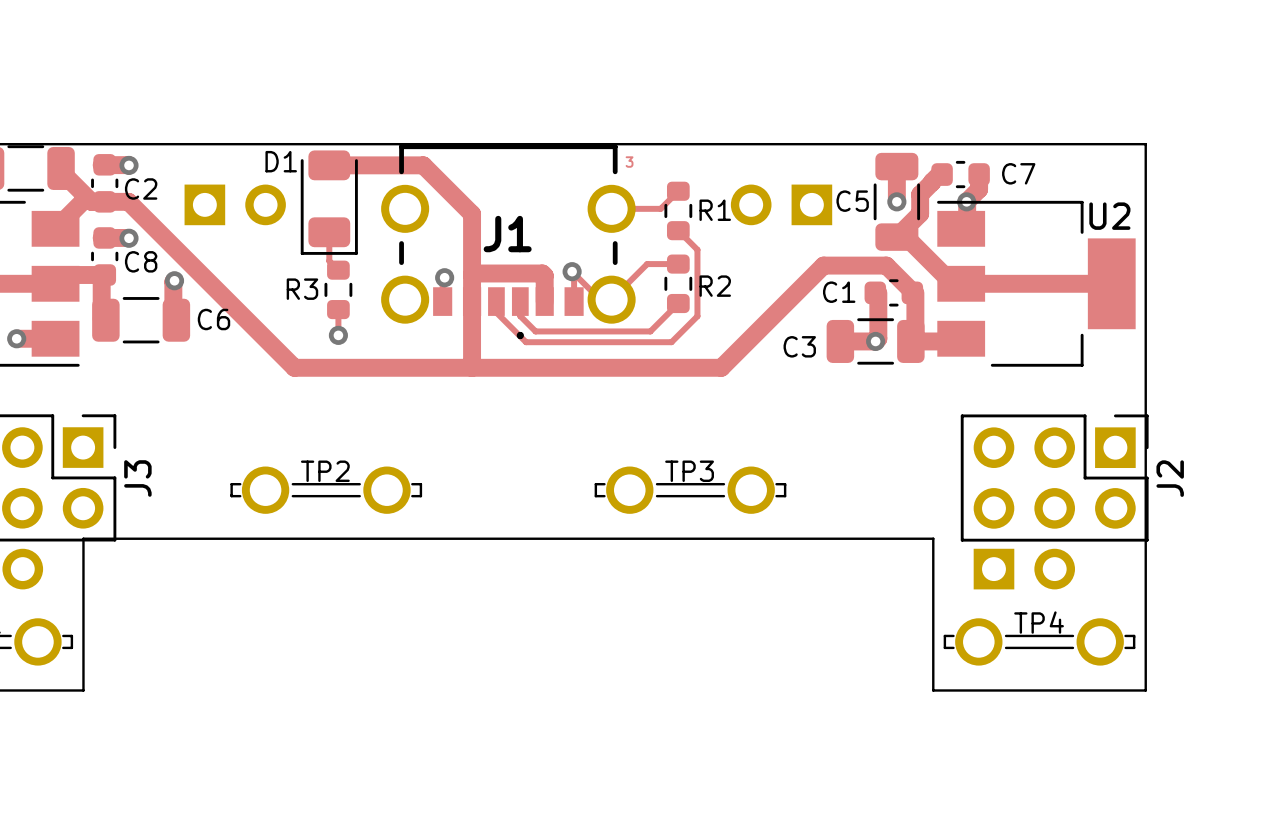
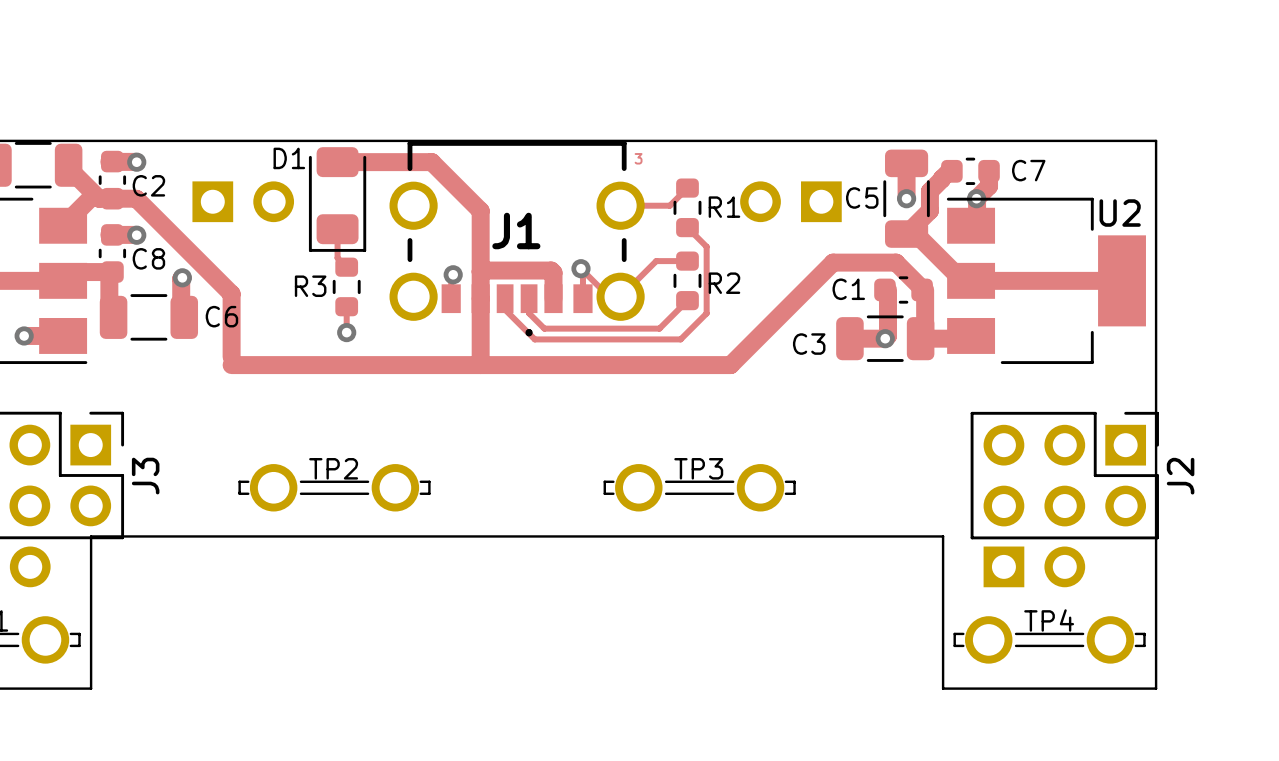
track: (223, 296) (294, 367) -> (231, 365) (302, 365)
track: none -> (231, 294) (231, 356)

